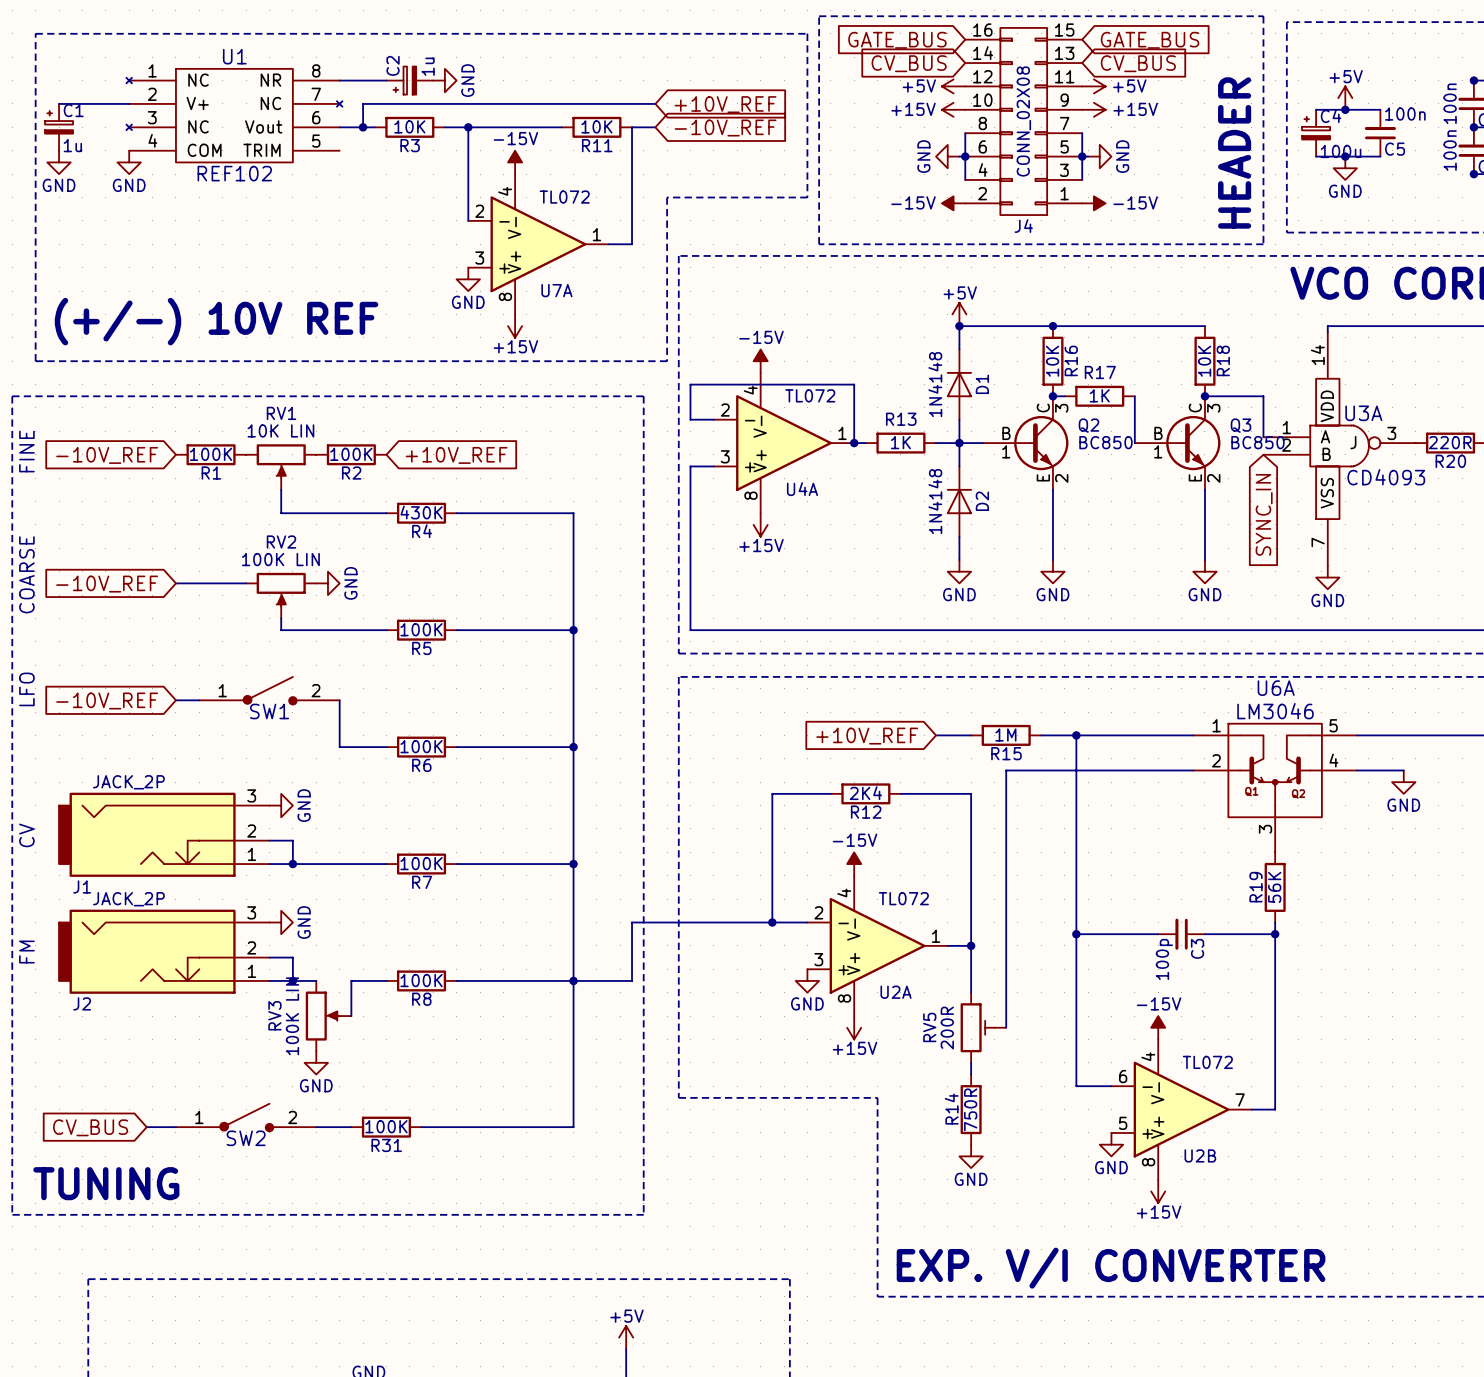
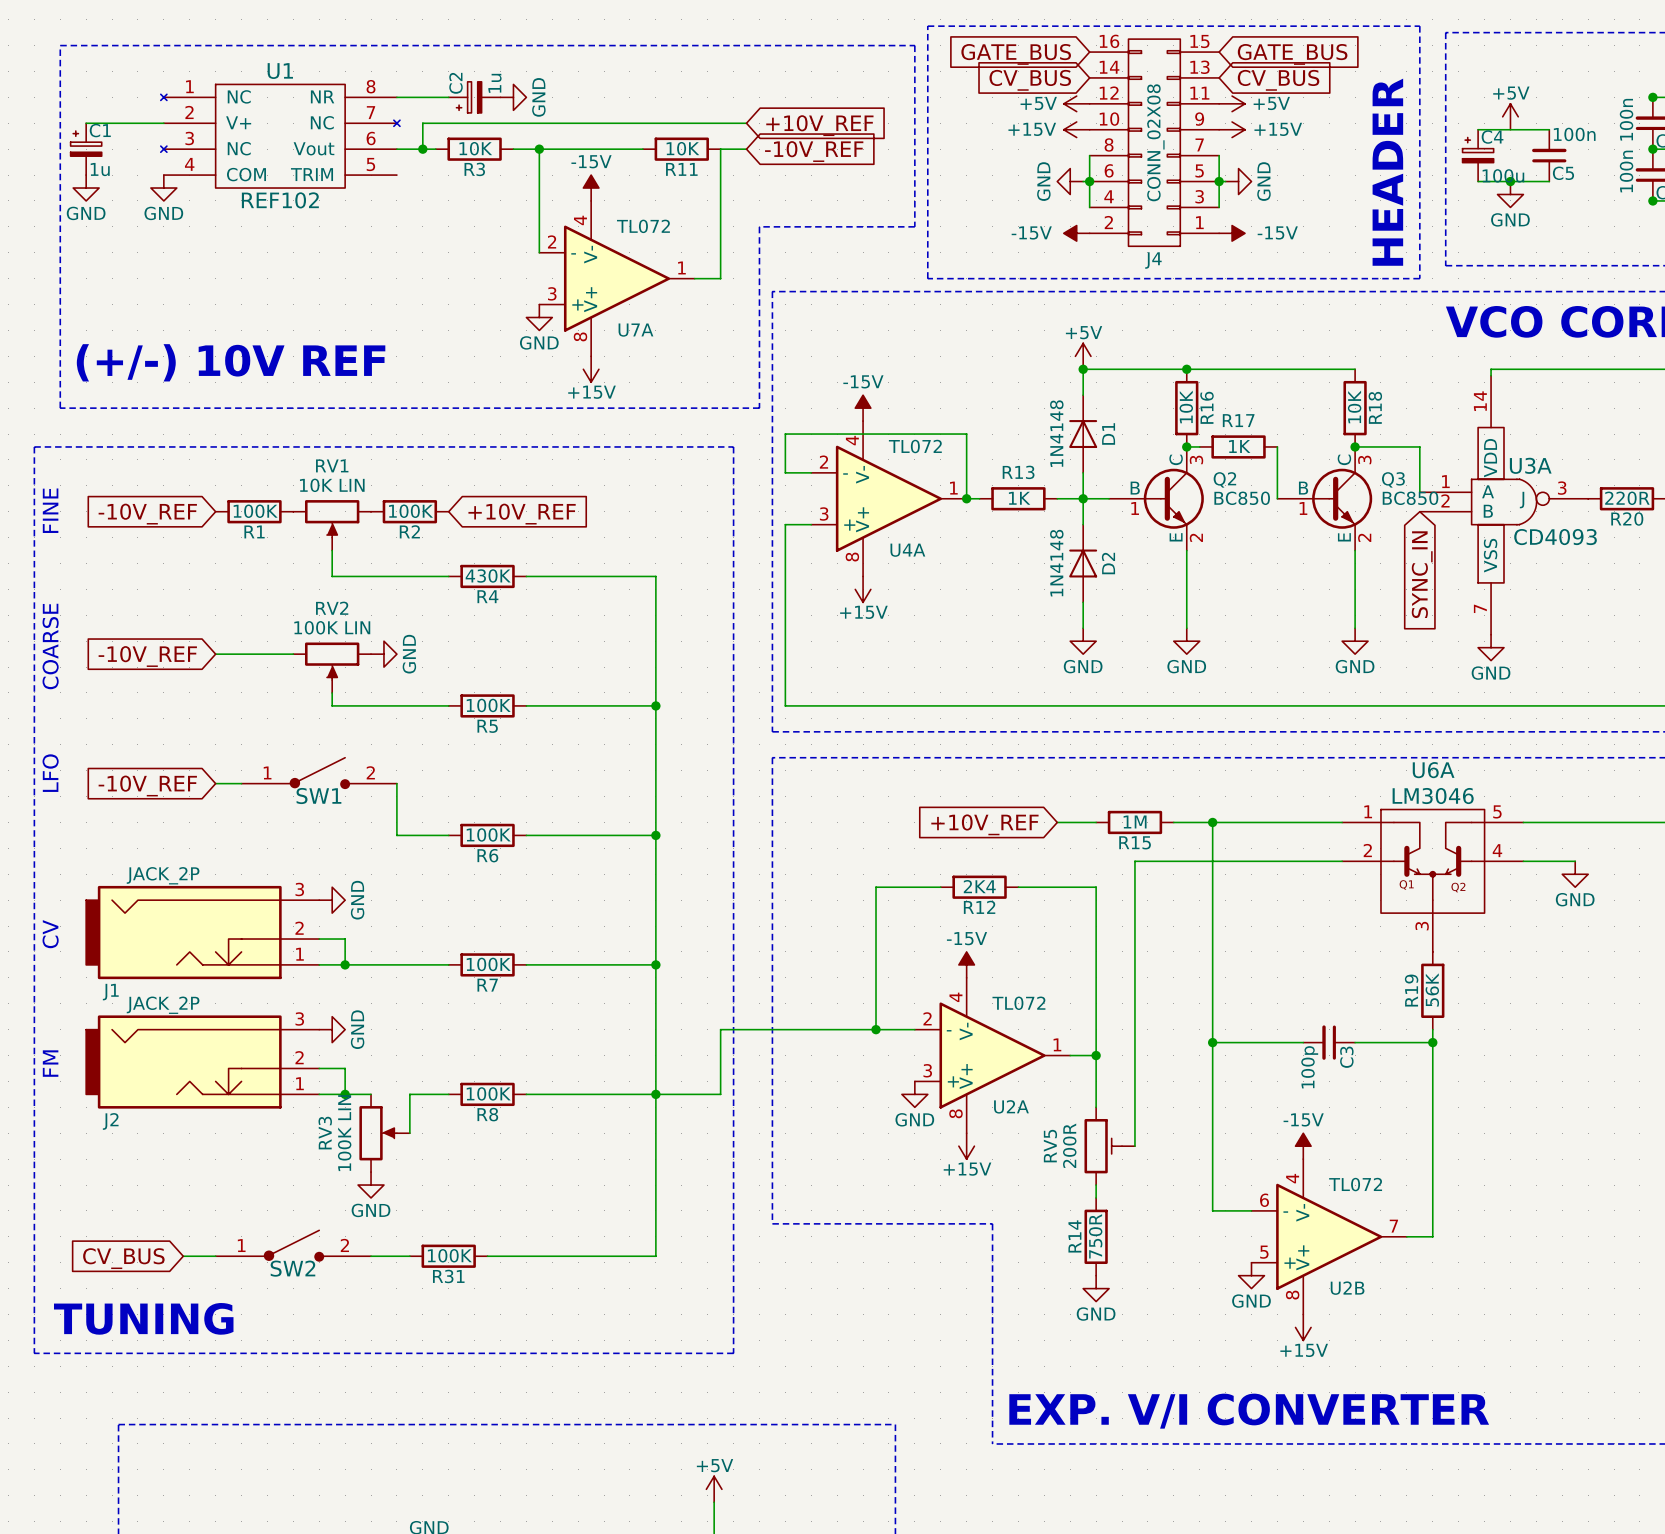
junction: (1345, 109) -> none

